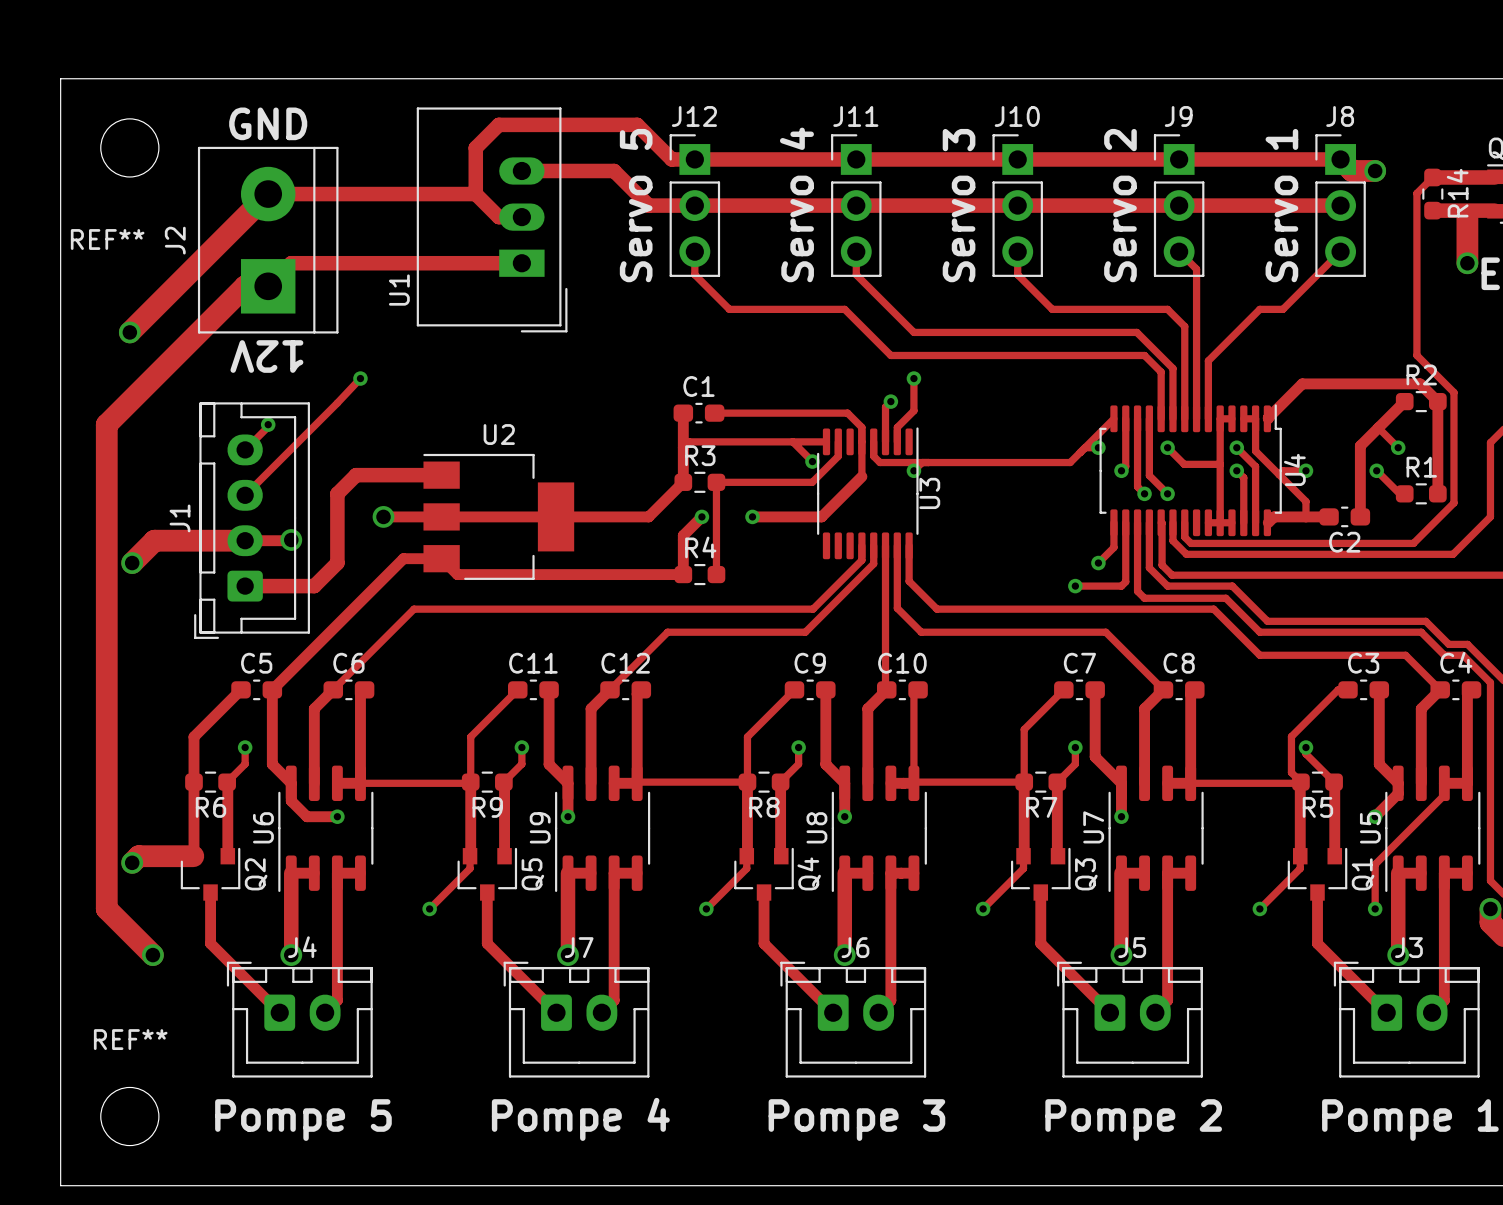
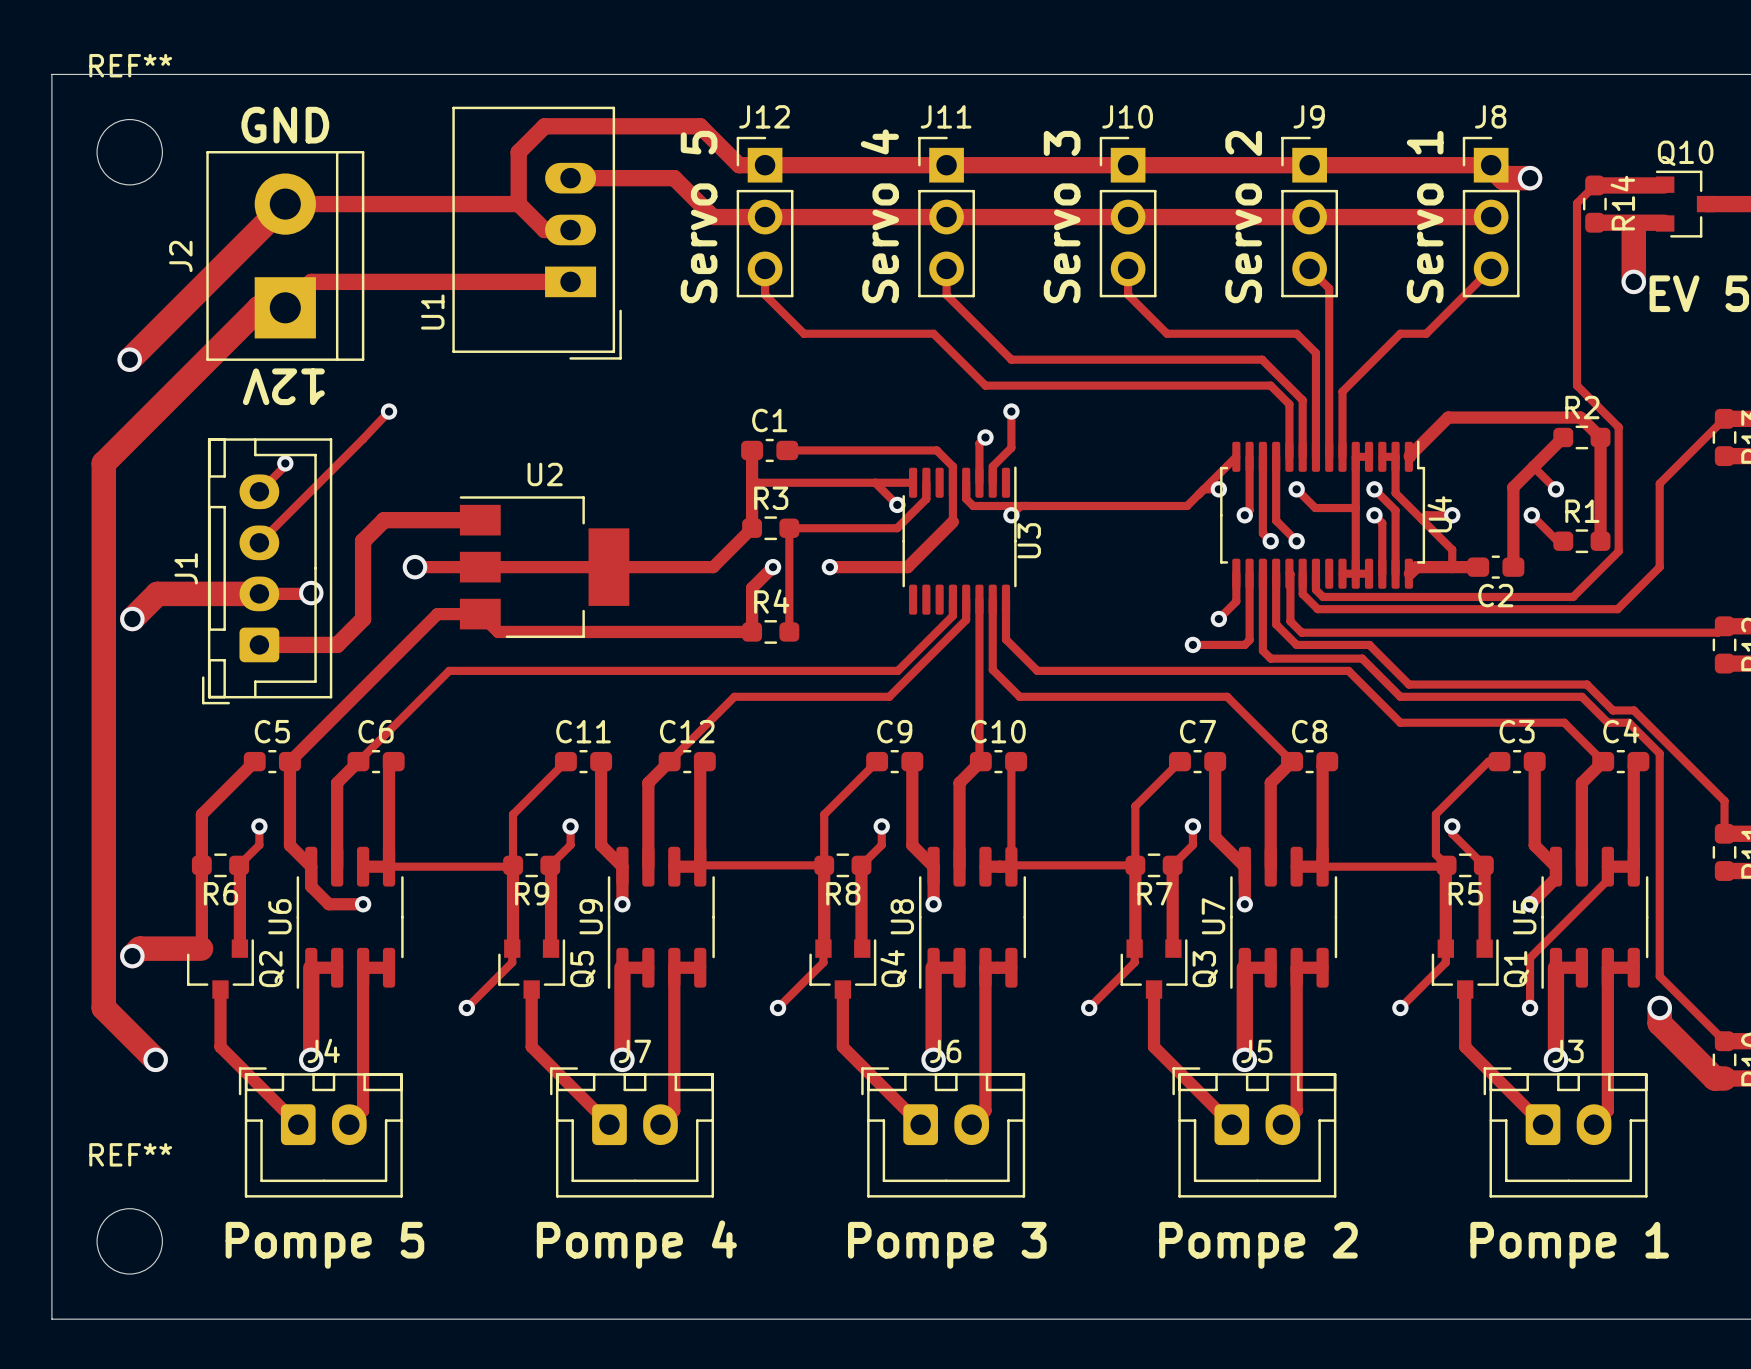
REF** name position: REF** (107, 239) -> REF** (130, 65)

